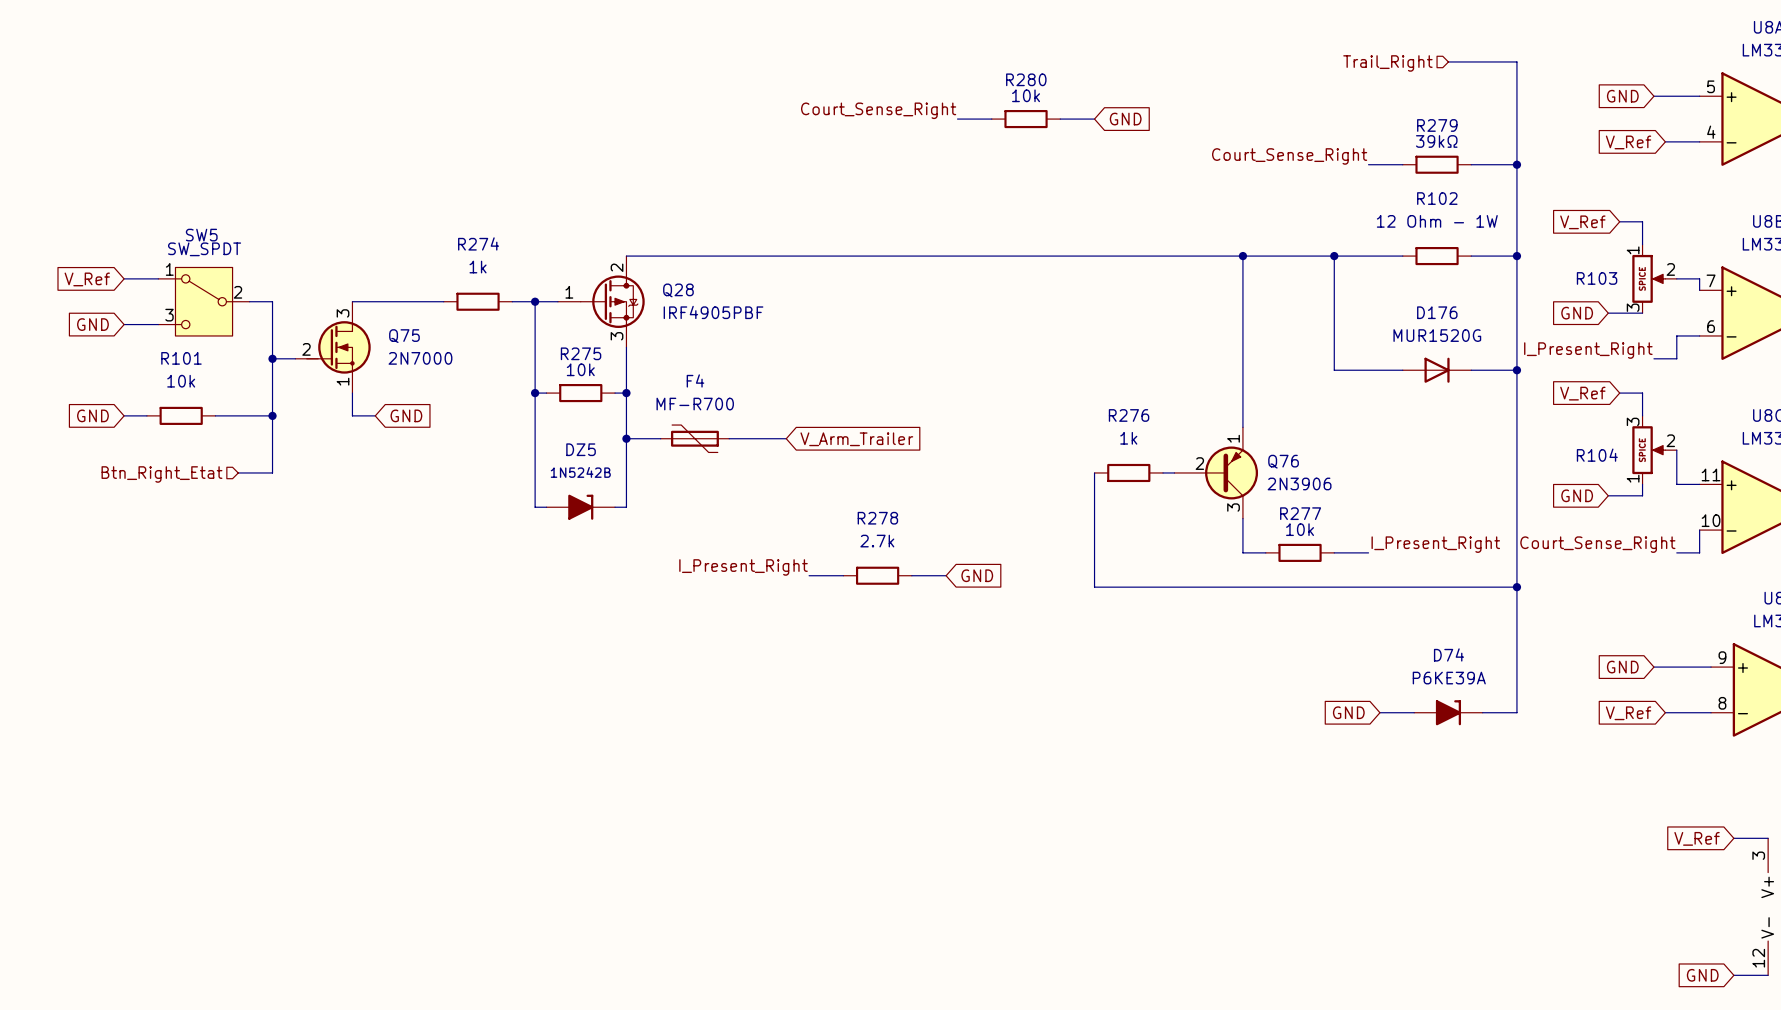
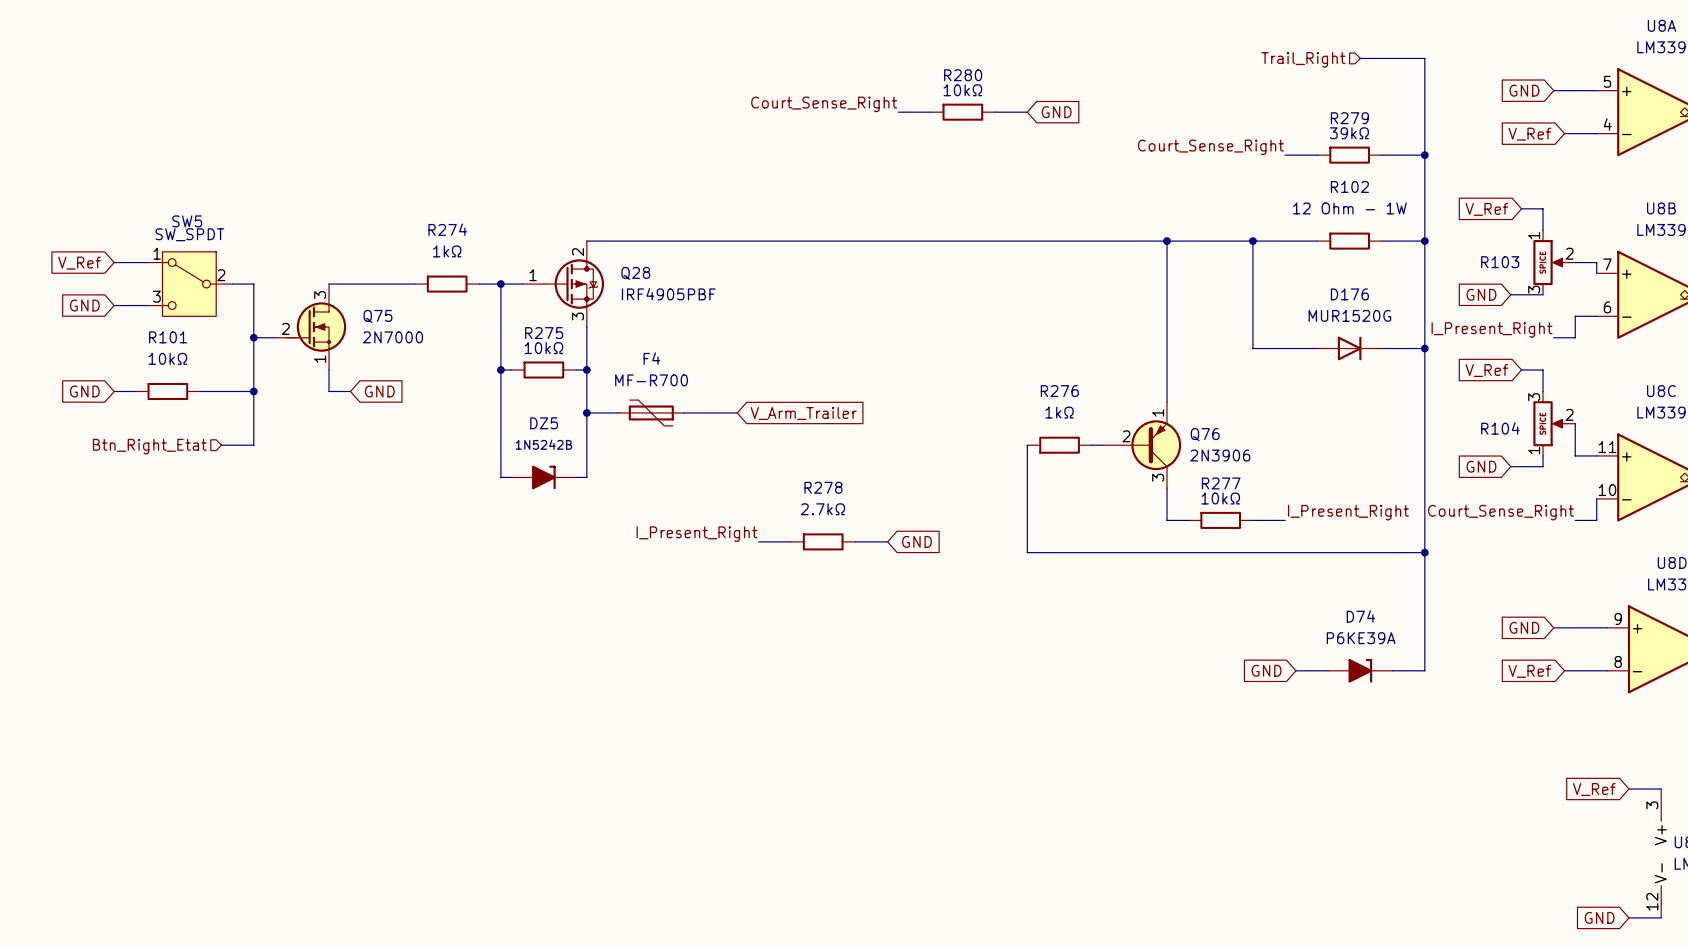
R280 value: 10k (1026, 95) -> 10kΩ (962, 90)
R274 value: 1k (478, 267) -> 1kΩ (447, 251)
R275 value: 10k (580, 369) -> 10kΩ (543, 348)
R101 value: 10k (181, 381) -> 10kΩ (167, 358)
R276 value: 1k (1128, 438) -> 1kΩ (1059, 412)
R277 value: 10k (1300, 529) -> 10kΩ (1220, 498)
R278 value: 2.7k (877, 541) -> 2.7kΩ (822, 509)

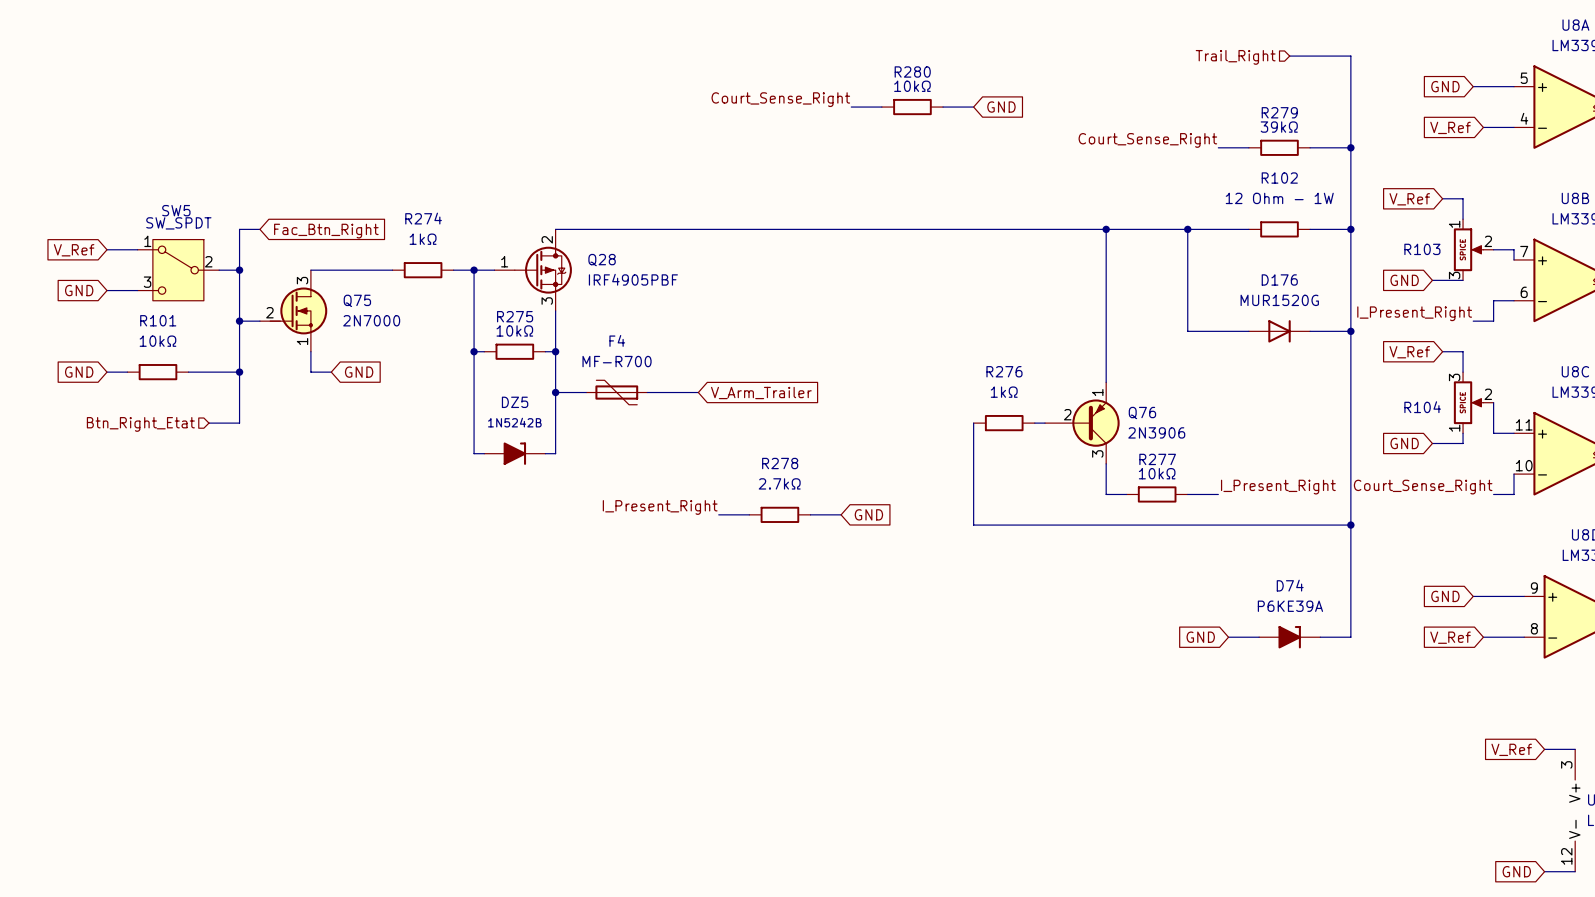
wire: none -> (259, 229) (239, 229) (239, 270)
global label: none -> Fac_Btn_Right (326, 231)
junction: none -> (239, 270)

